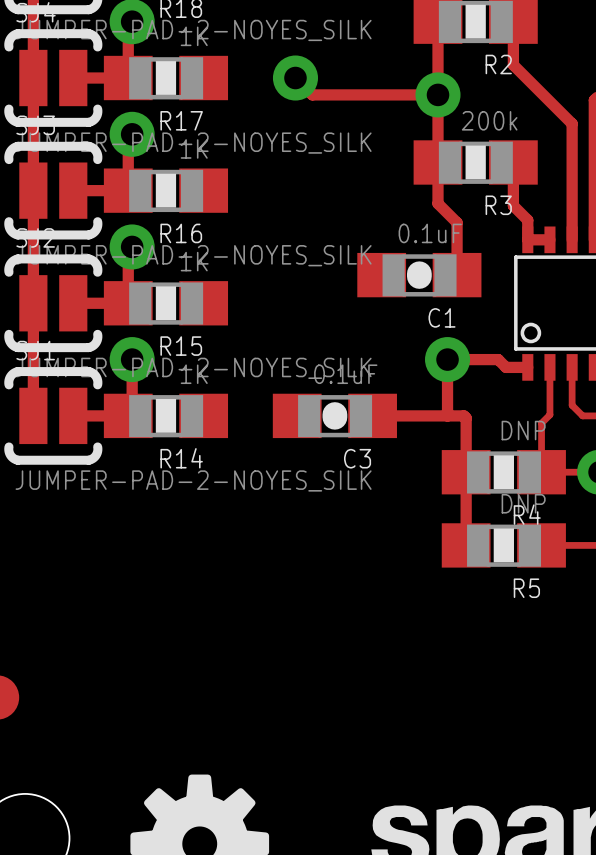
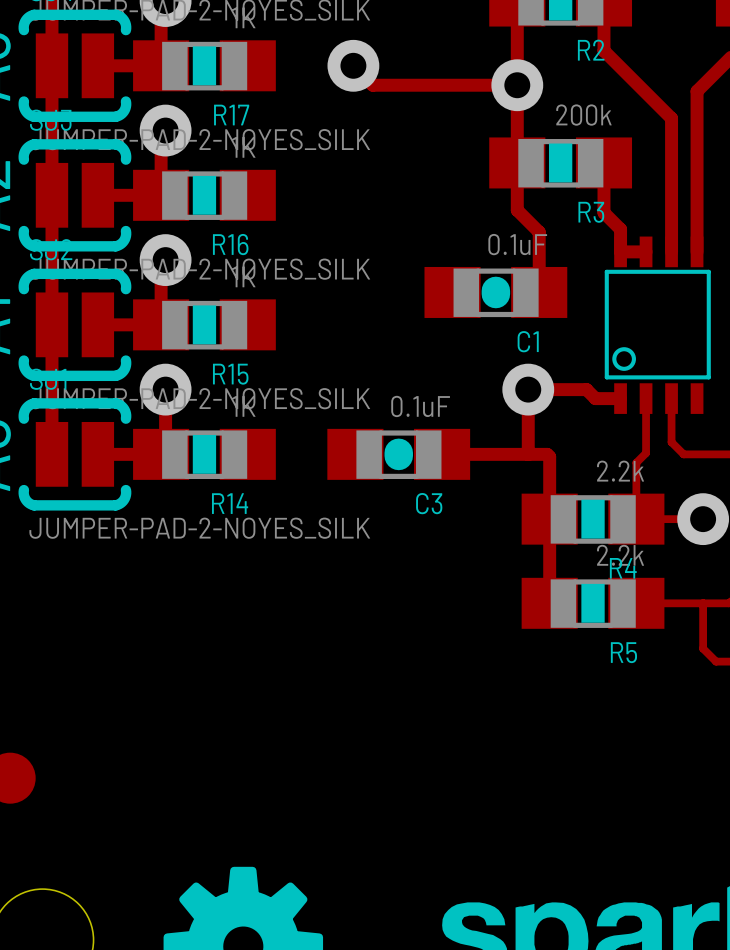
R4 value: DNP (523, 430) -> 2.2k (620, 471)
R5 value: DNP (523, 503) -> 2.2k (620, 555)

